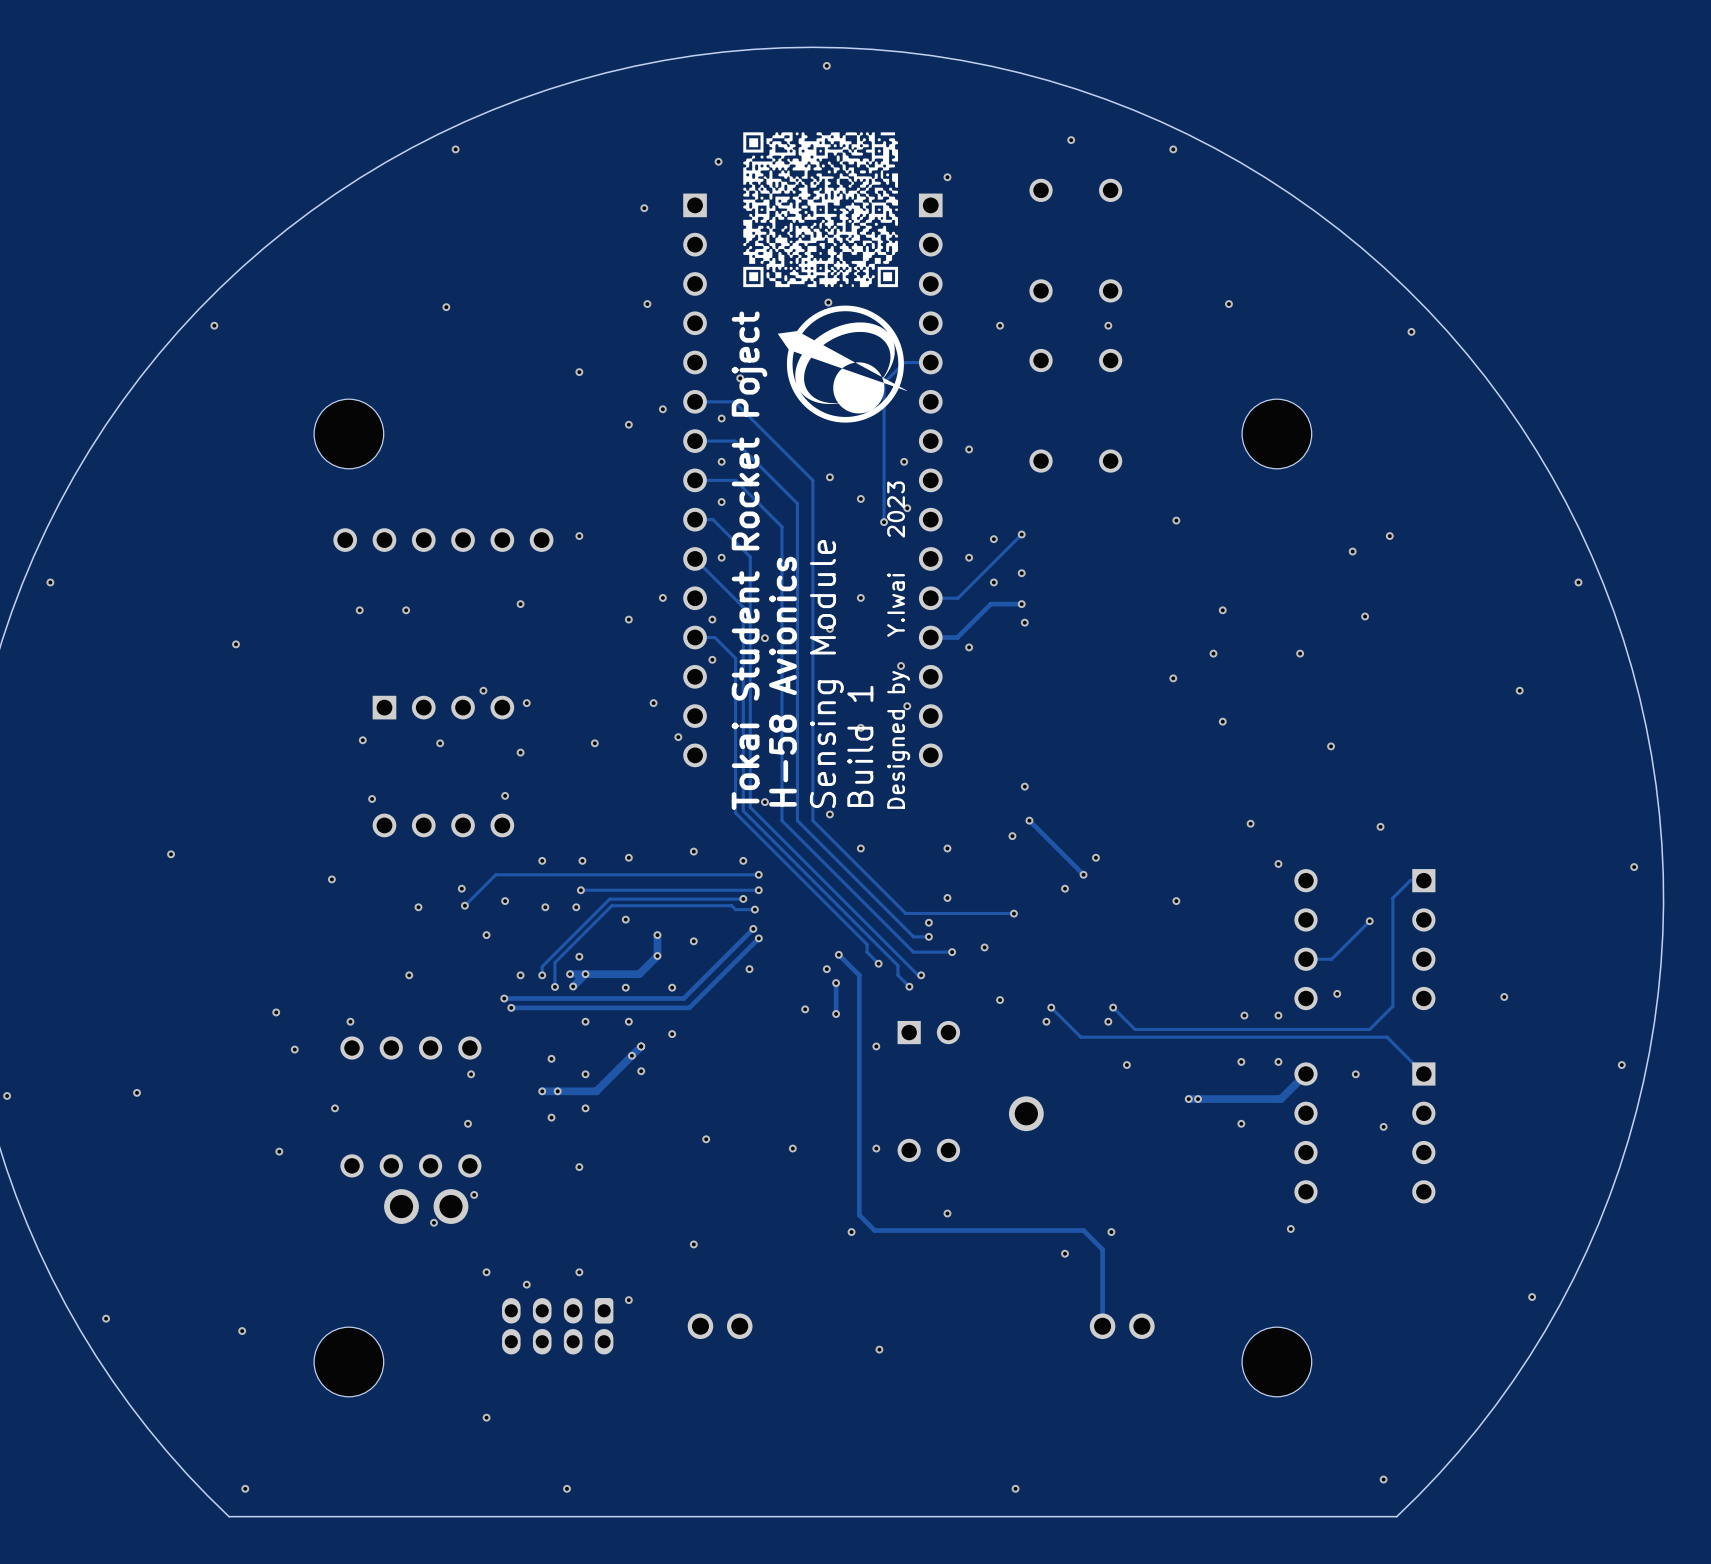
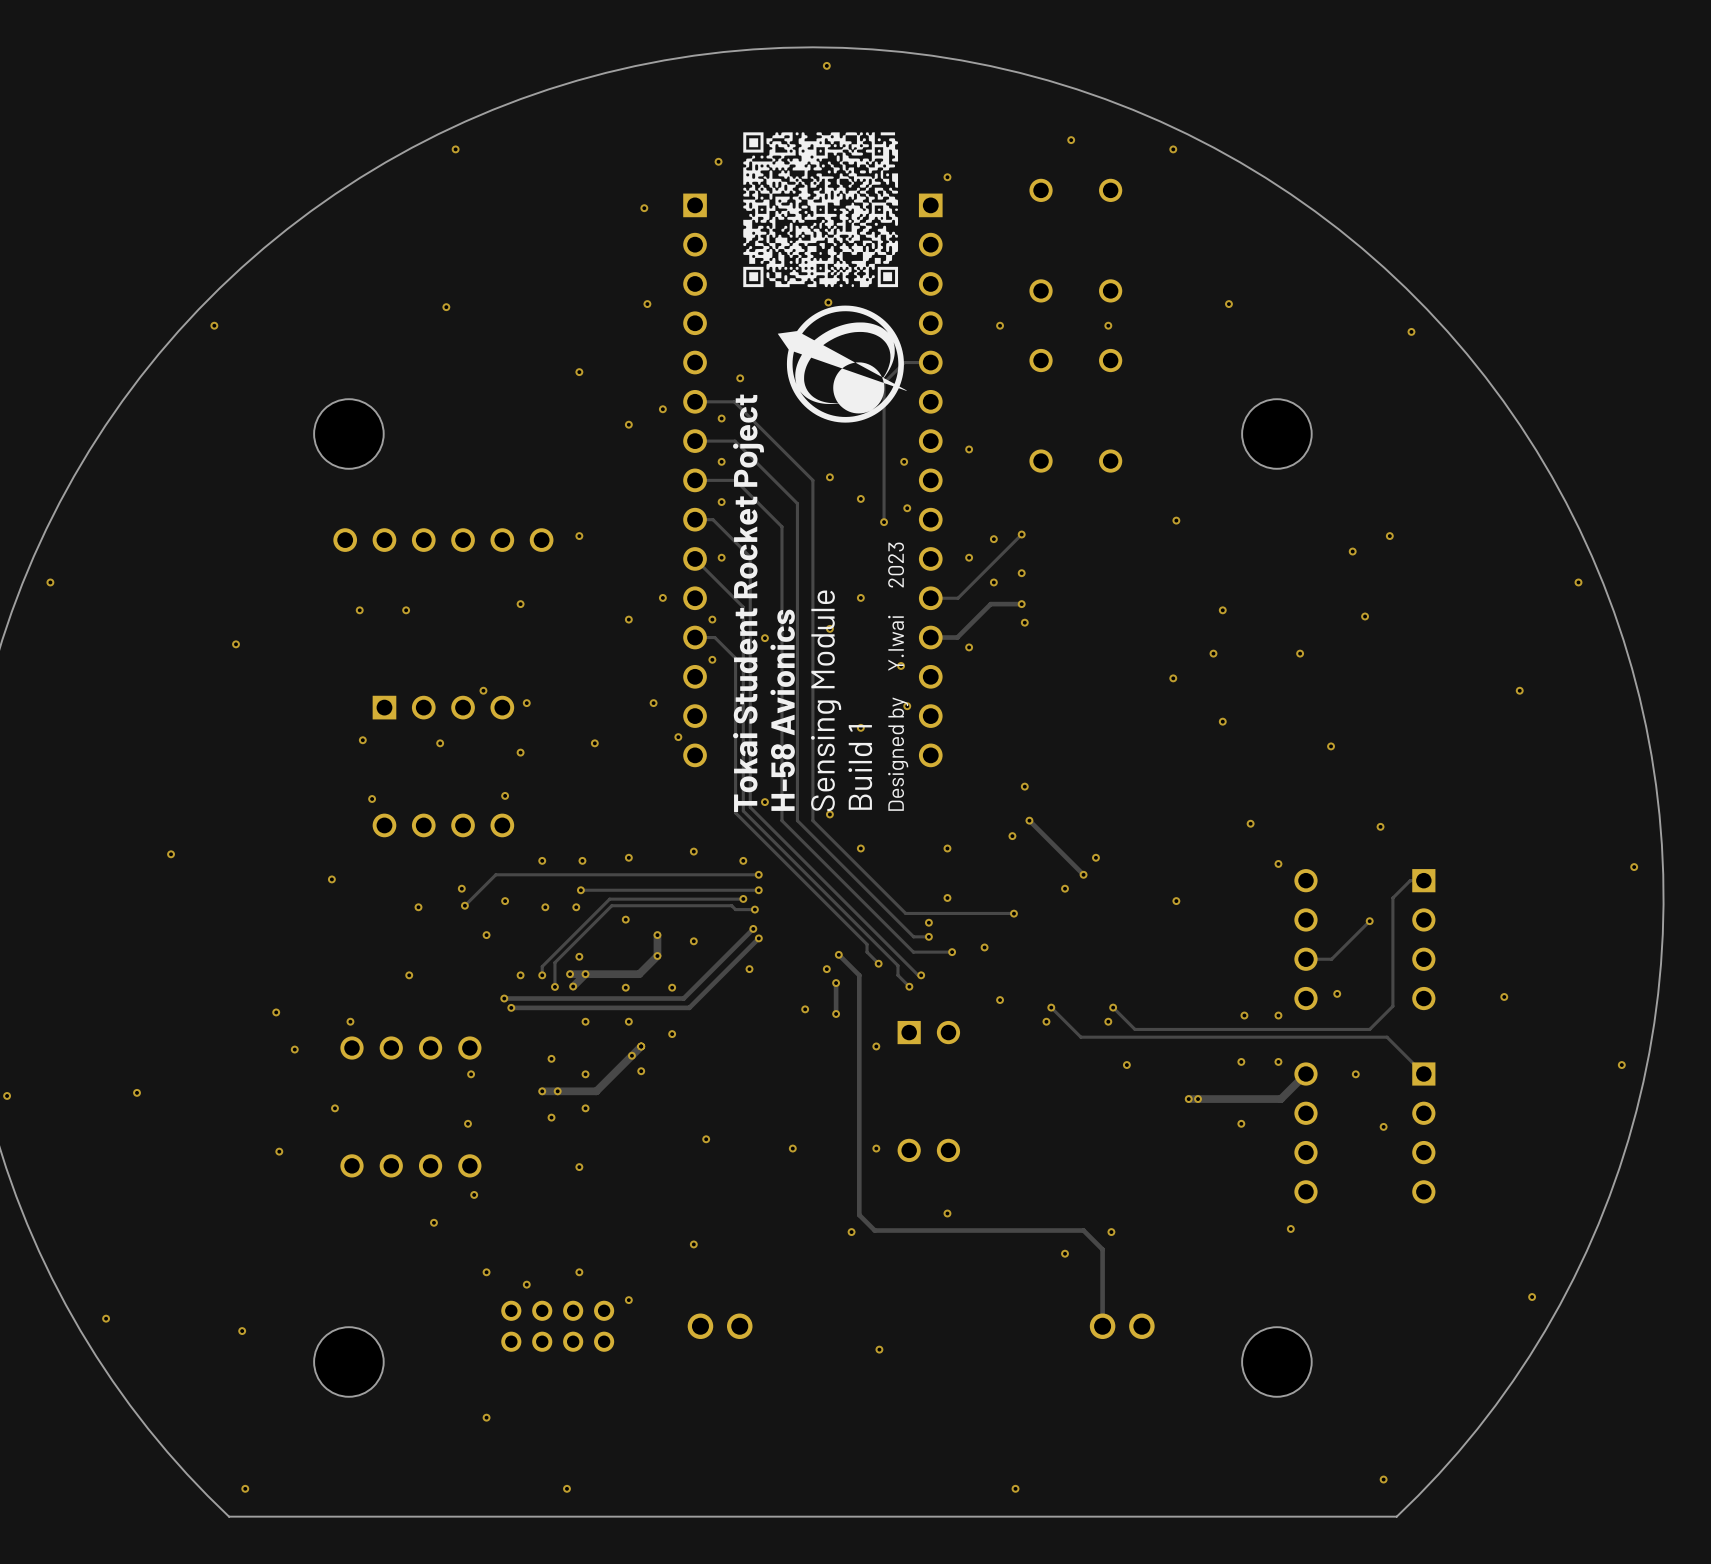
part: (1026, 1113) -> none
part: (401, 1206) -> none
part: (450, 1206) -> none
part footprint: [502, 1298, 614, 1355] -> [501, 1300, 615, 1352]

